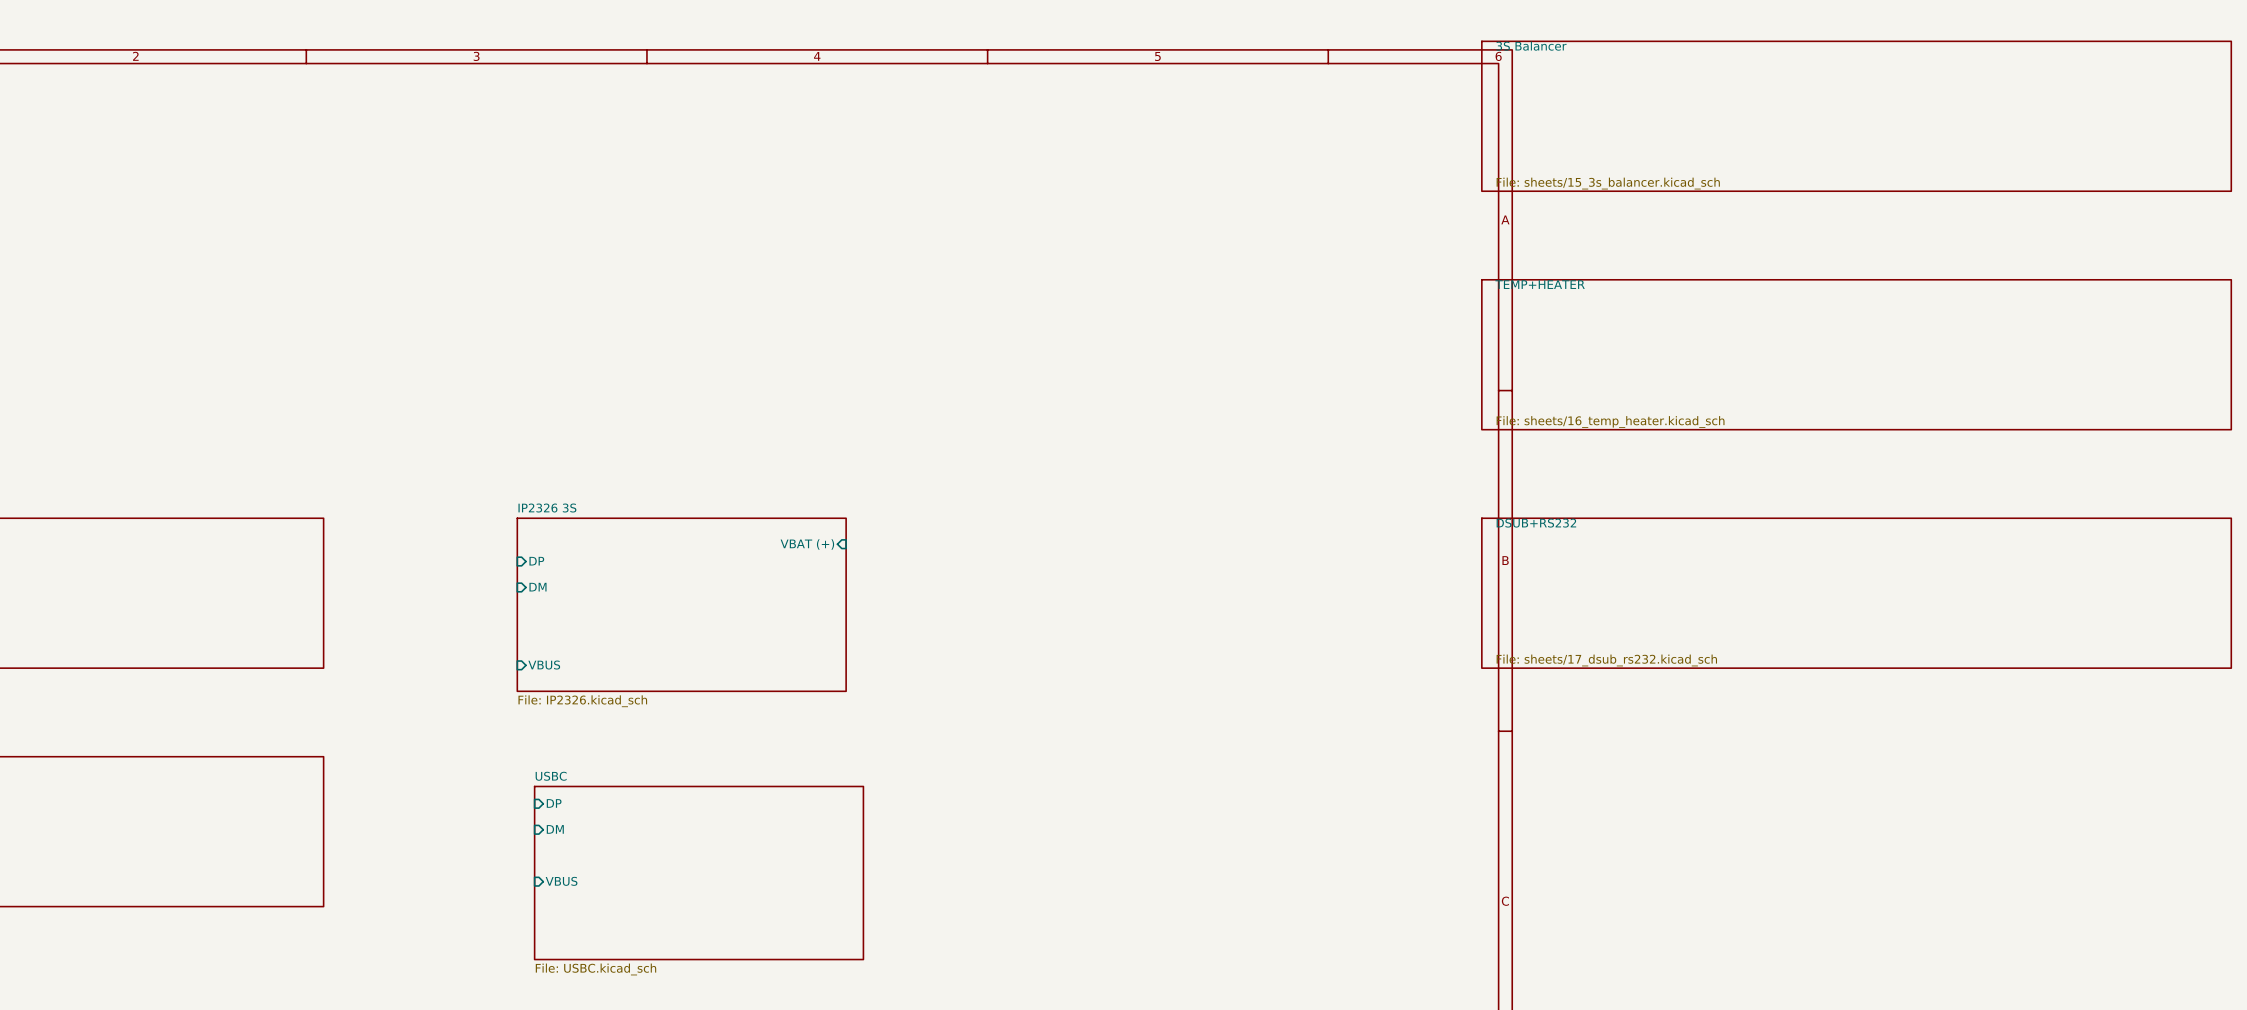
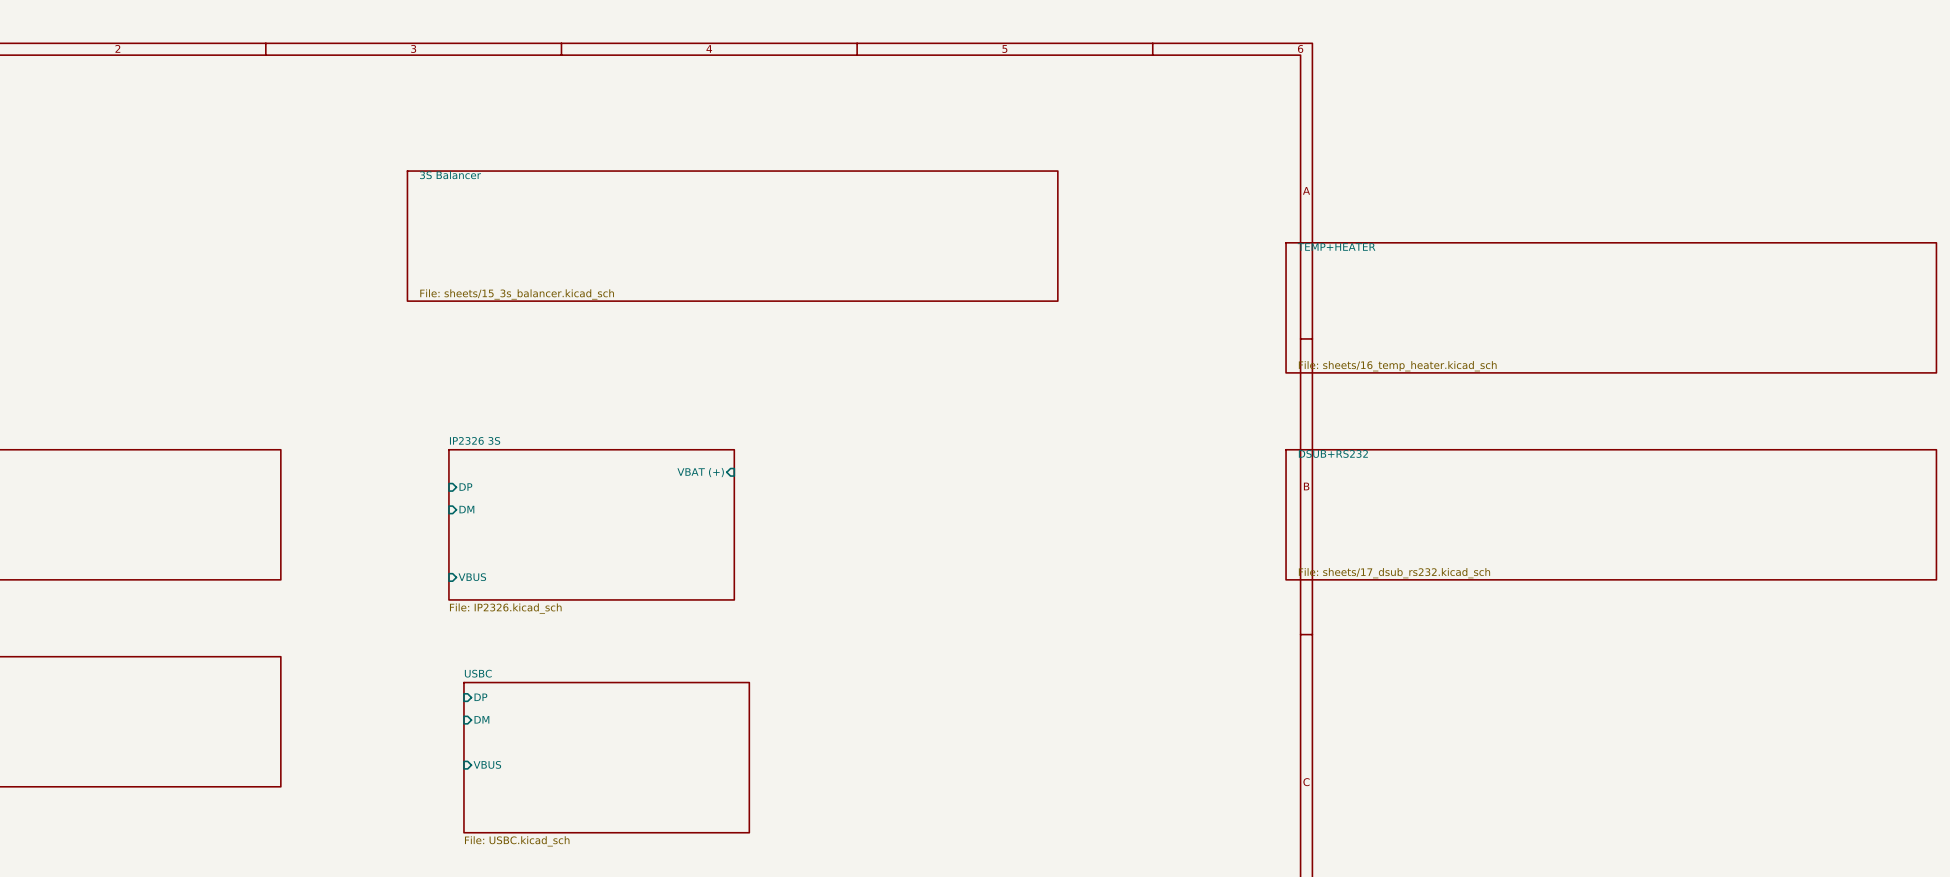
sheet 3S Balancer position: (1856, 116) -> (732, 236)

